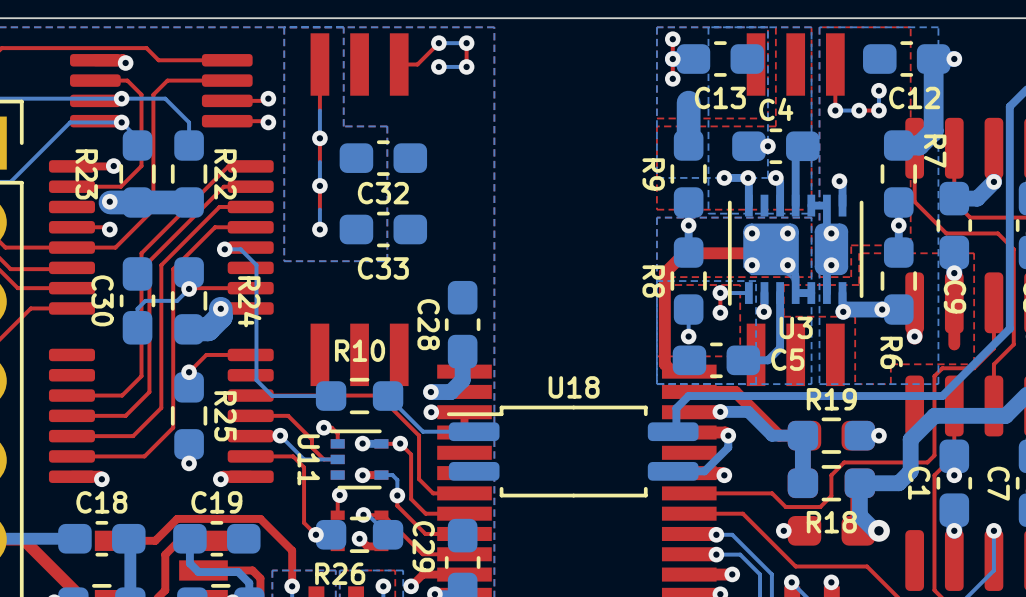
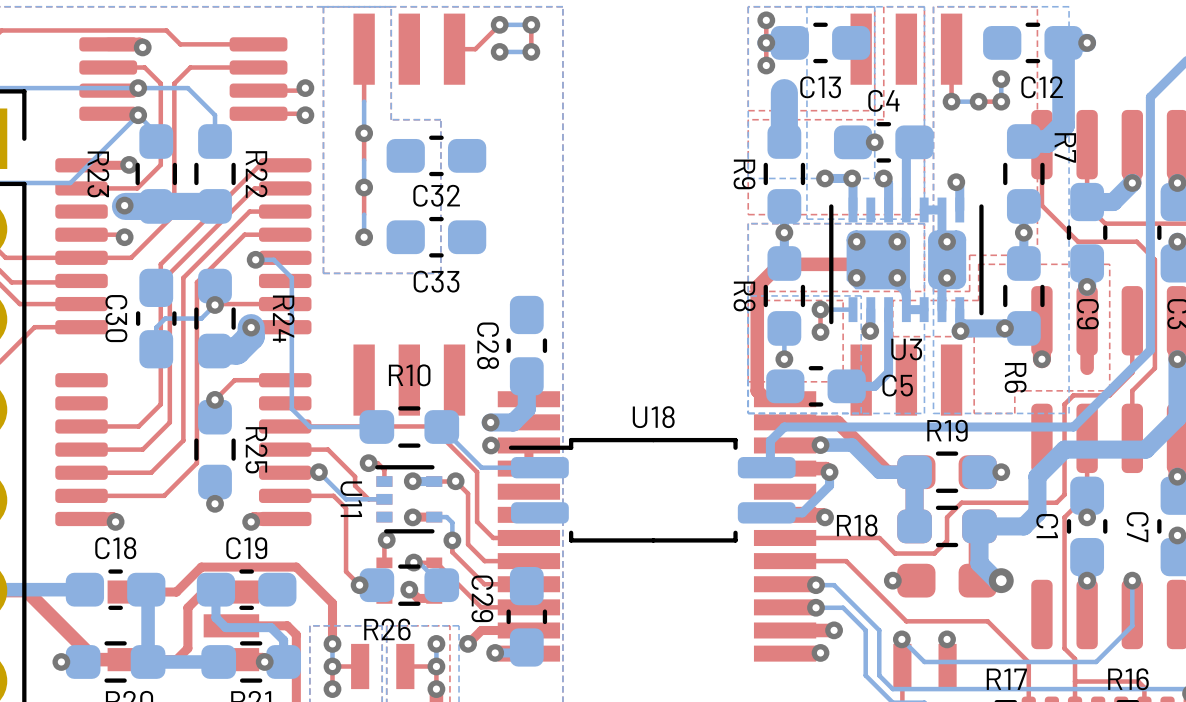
bottom track: (121, 122) (70, 122) (10, 181) -> (138, 115) (70, 182) (11, 182)
R18 name position: R18 (831, 522) -> R18 (857, 525)

